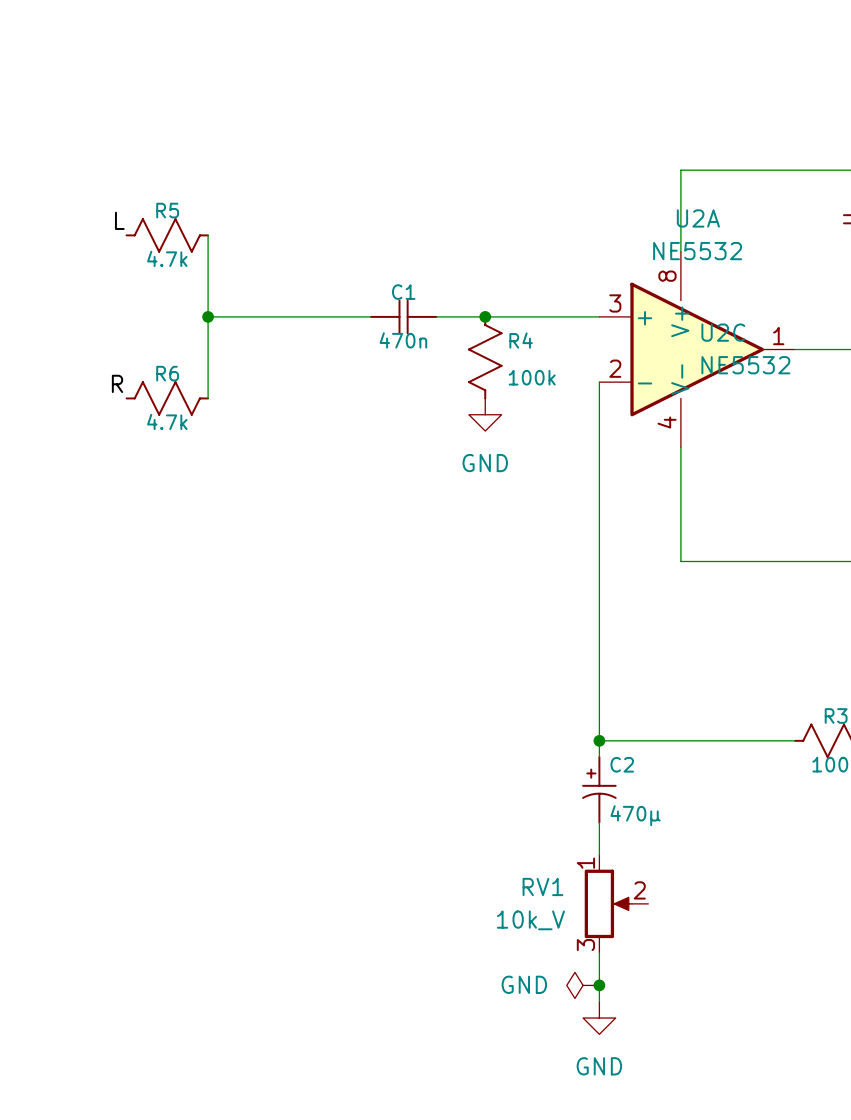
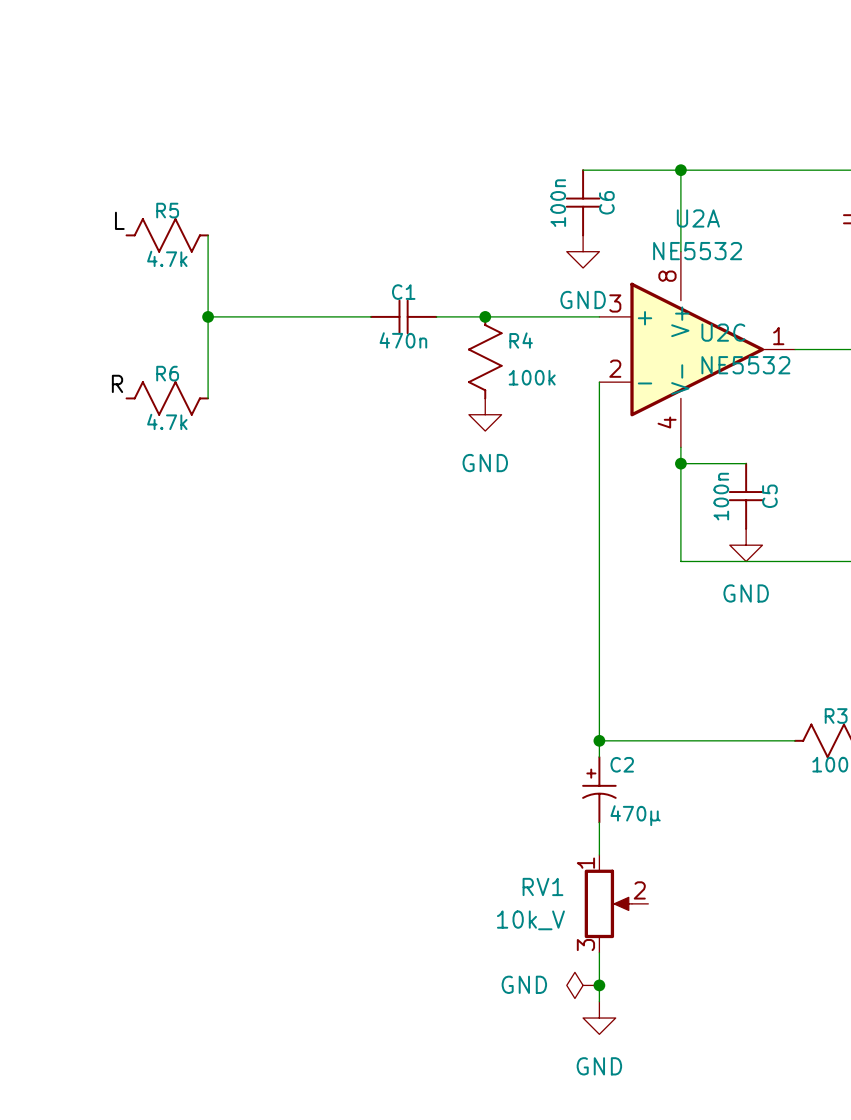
wire: none -> (583, 170) (680, 170)
junction: none -> (680, 170)
C6: none -> 100n (583, 202)
power symbol: none -> GND (583, 251)
wire: none -> (680, 463) (746, 463)
junction: none -> (680, 463)
C5: none -> 100n (746, 496)
power symbol: none -> GND (746, 545)

